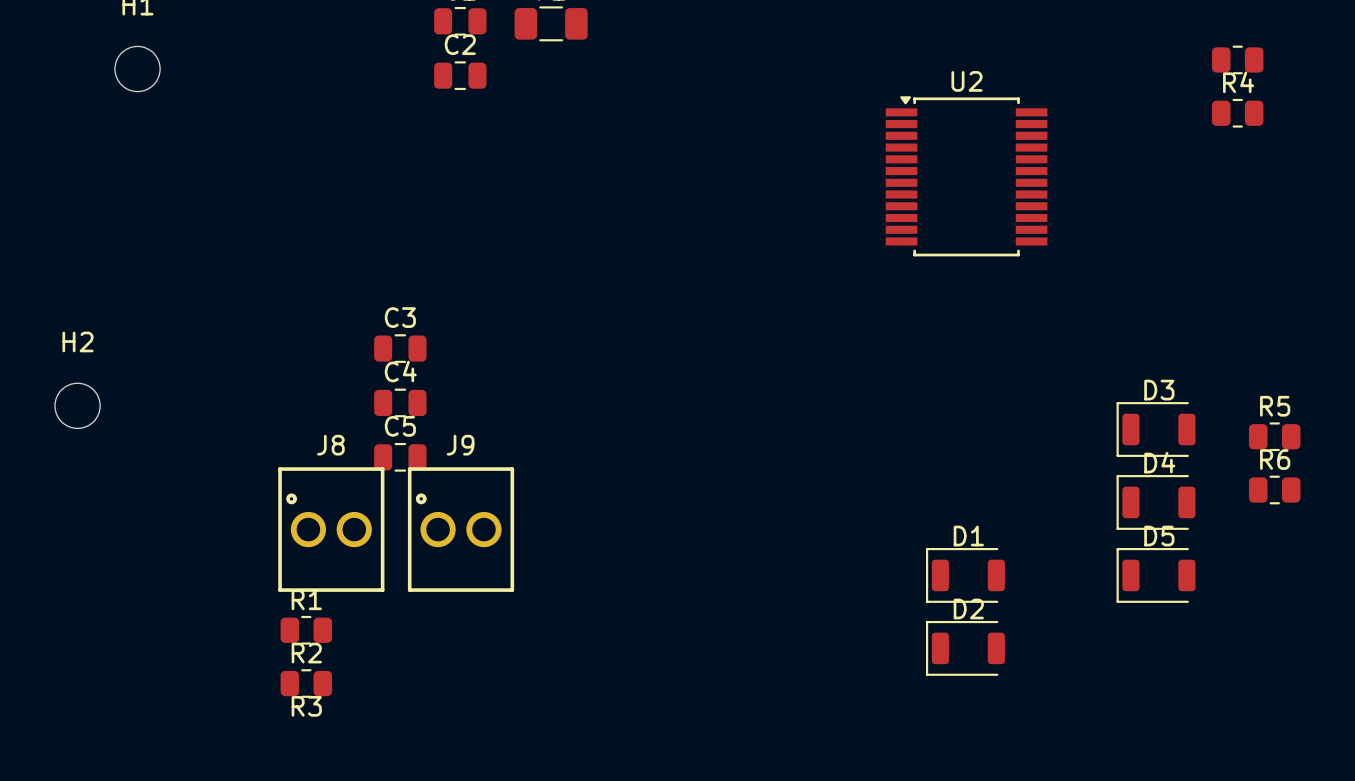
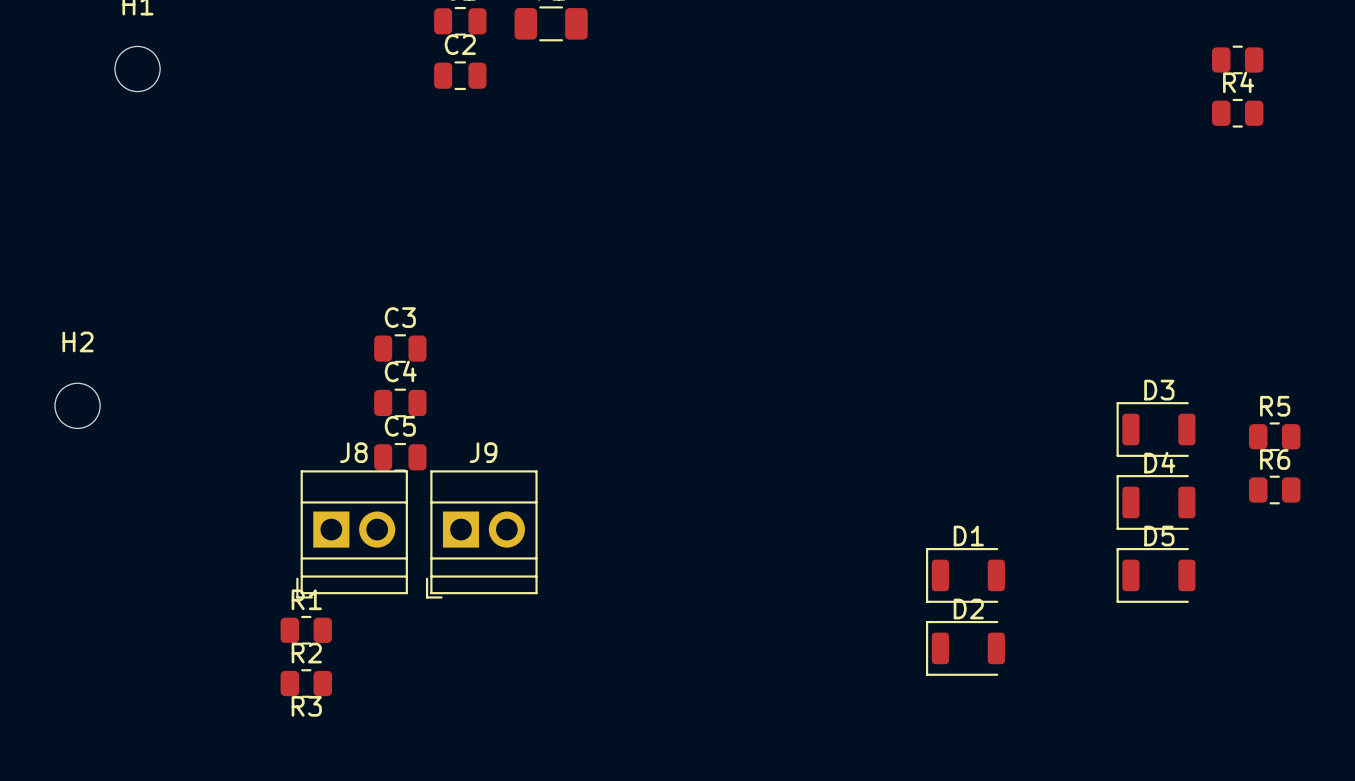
U2: (966, 176) -> none
J8 footprint: [278, 467, 385, 592] -> [296, 470, 408, 599]
J9 footprint: [407, 467, 515, 592] -> [425, 470, 538, 599]

